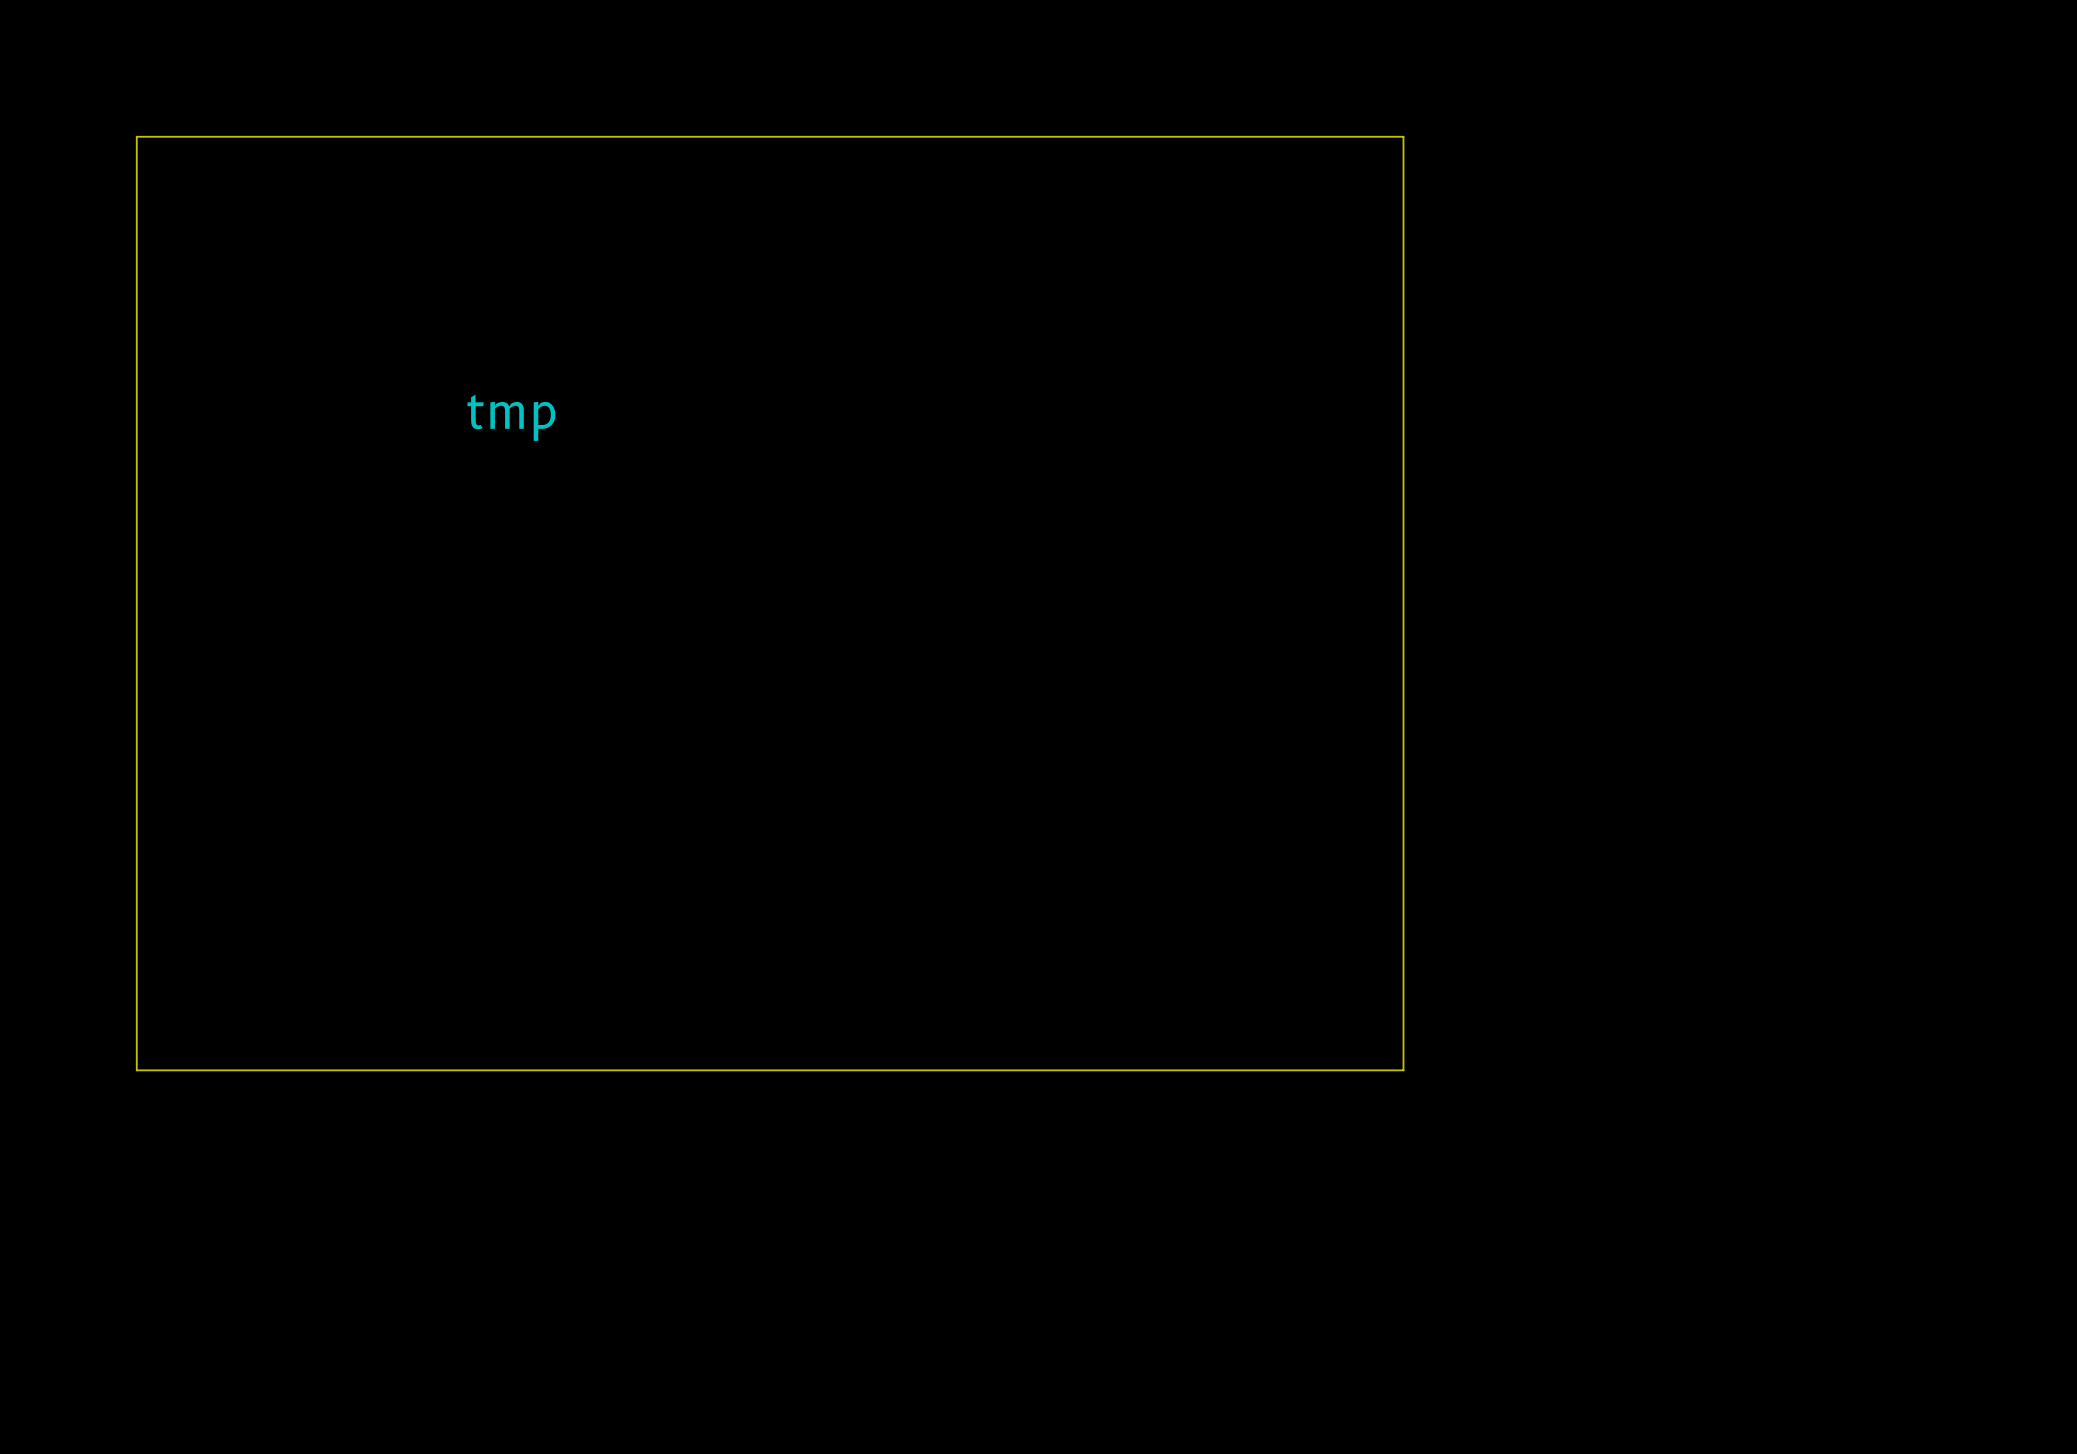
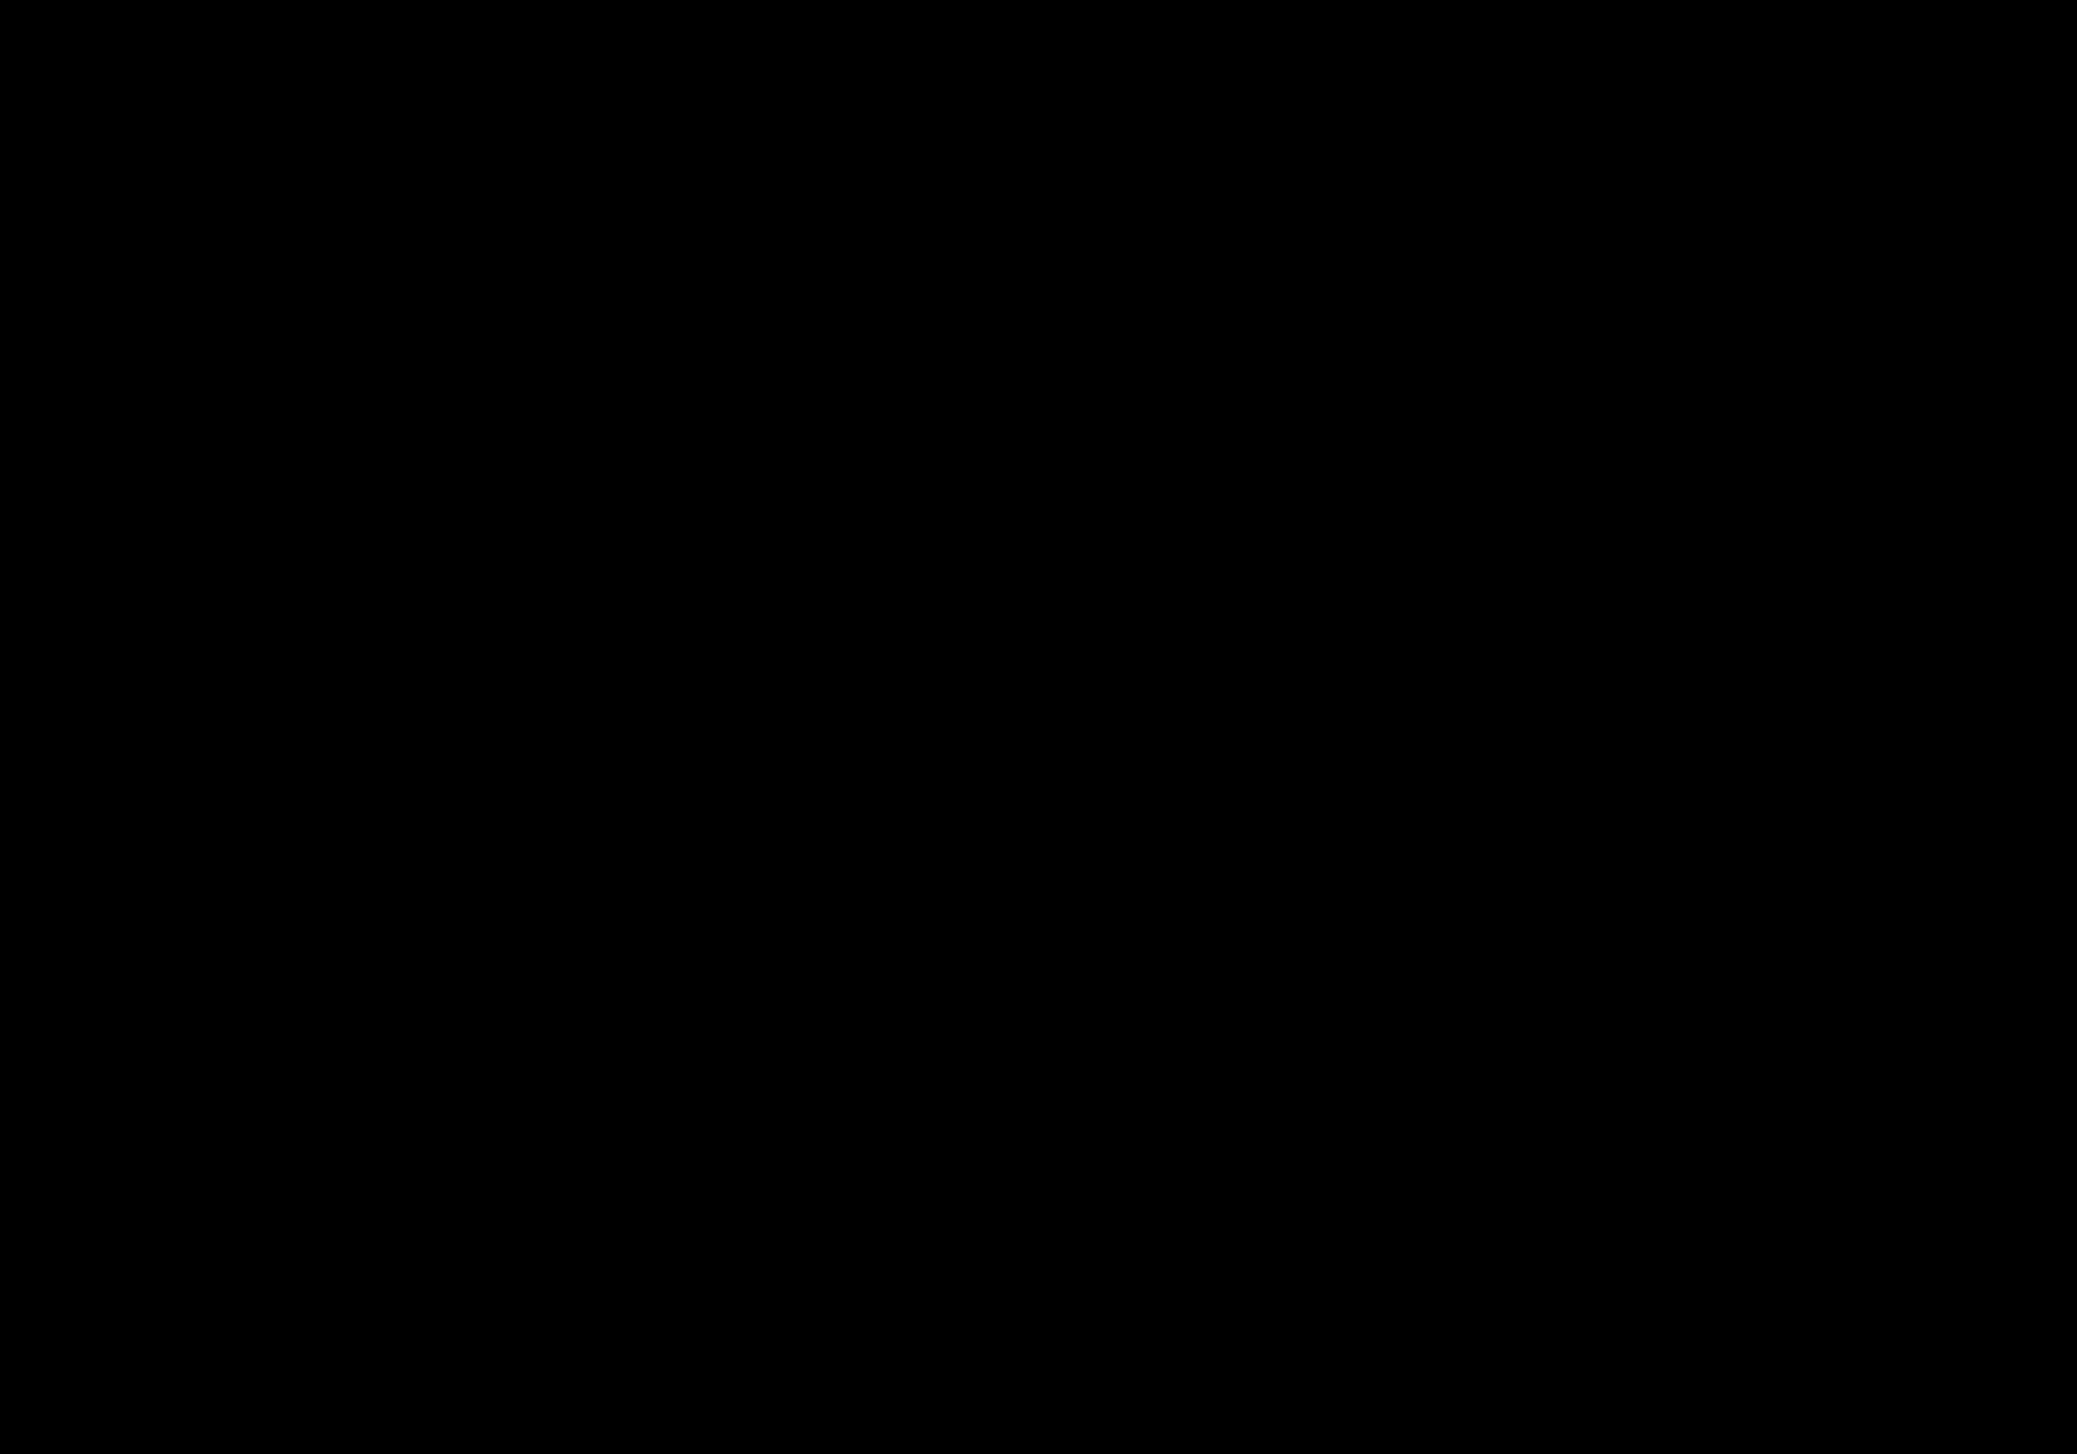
board edge: (136, 136) (1403, 136) (1403, 1070) (136, 1070) (136, 136) -> none
text: tmp (511, 417) -> none

